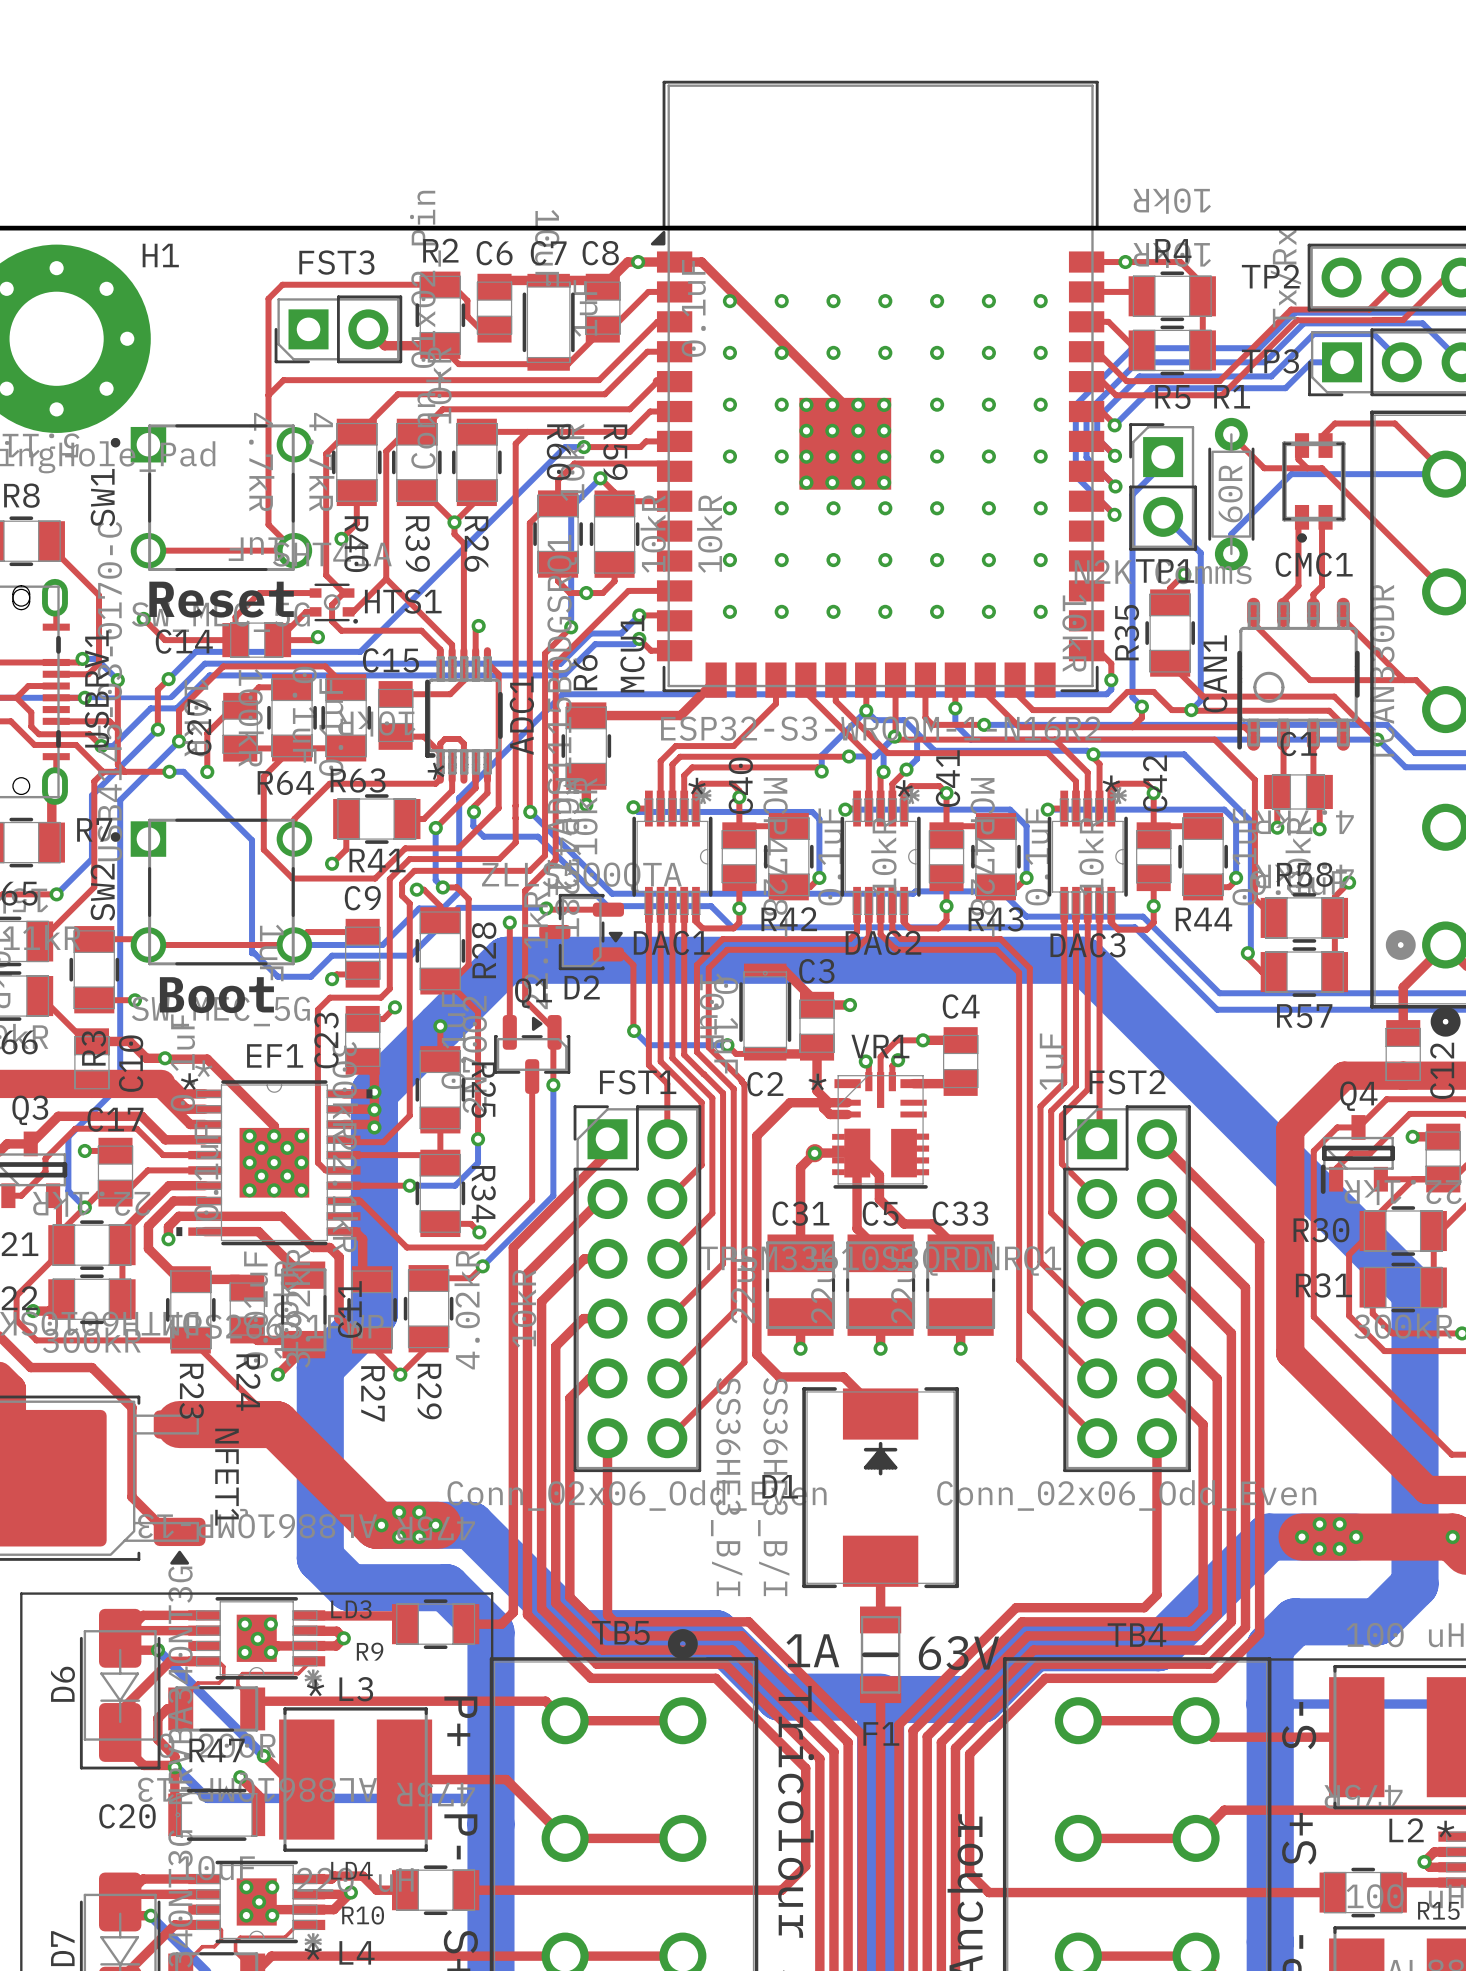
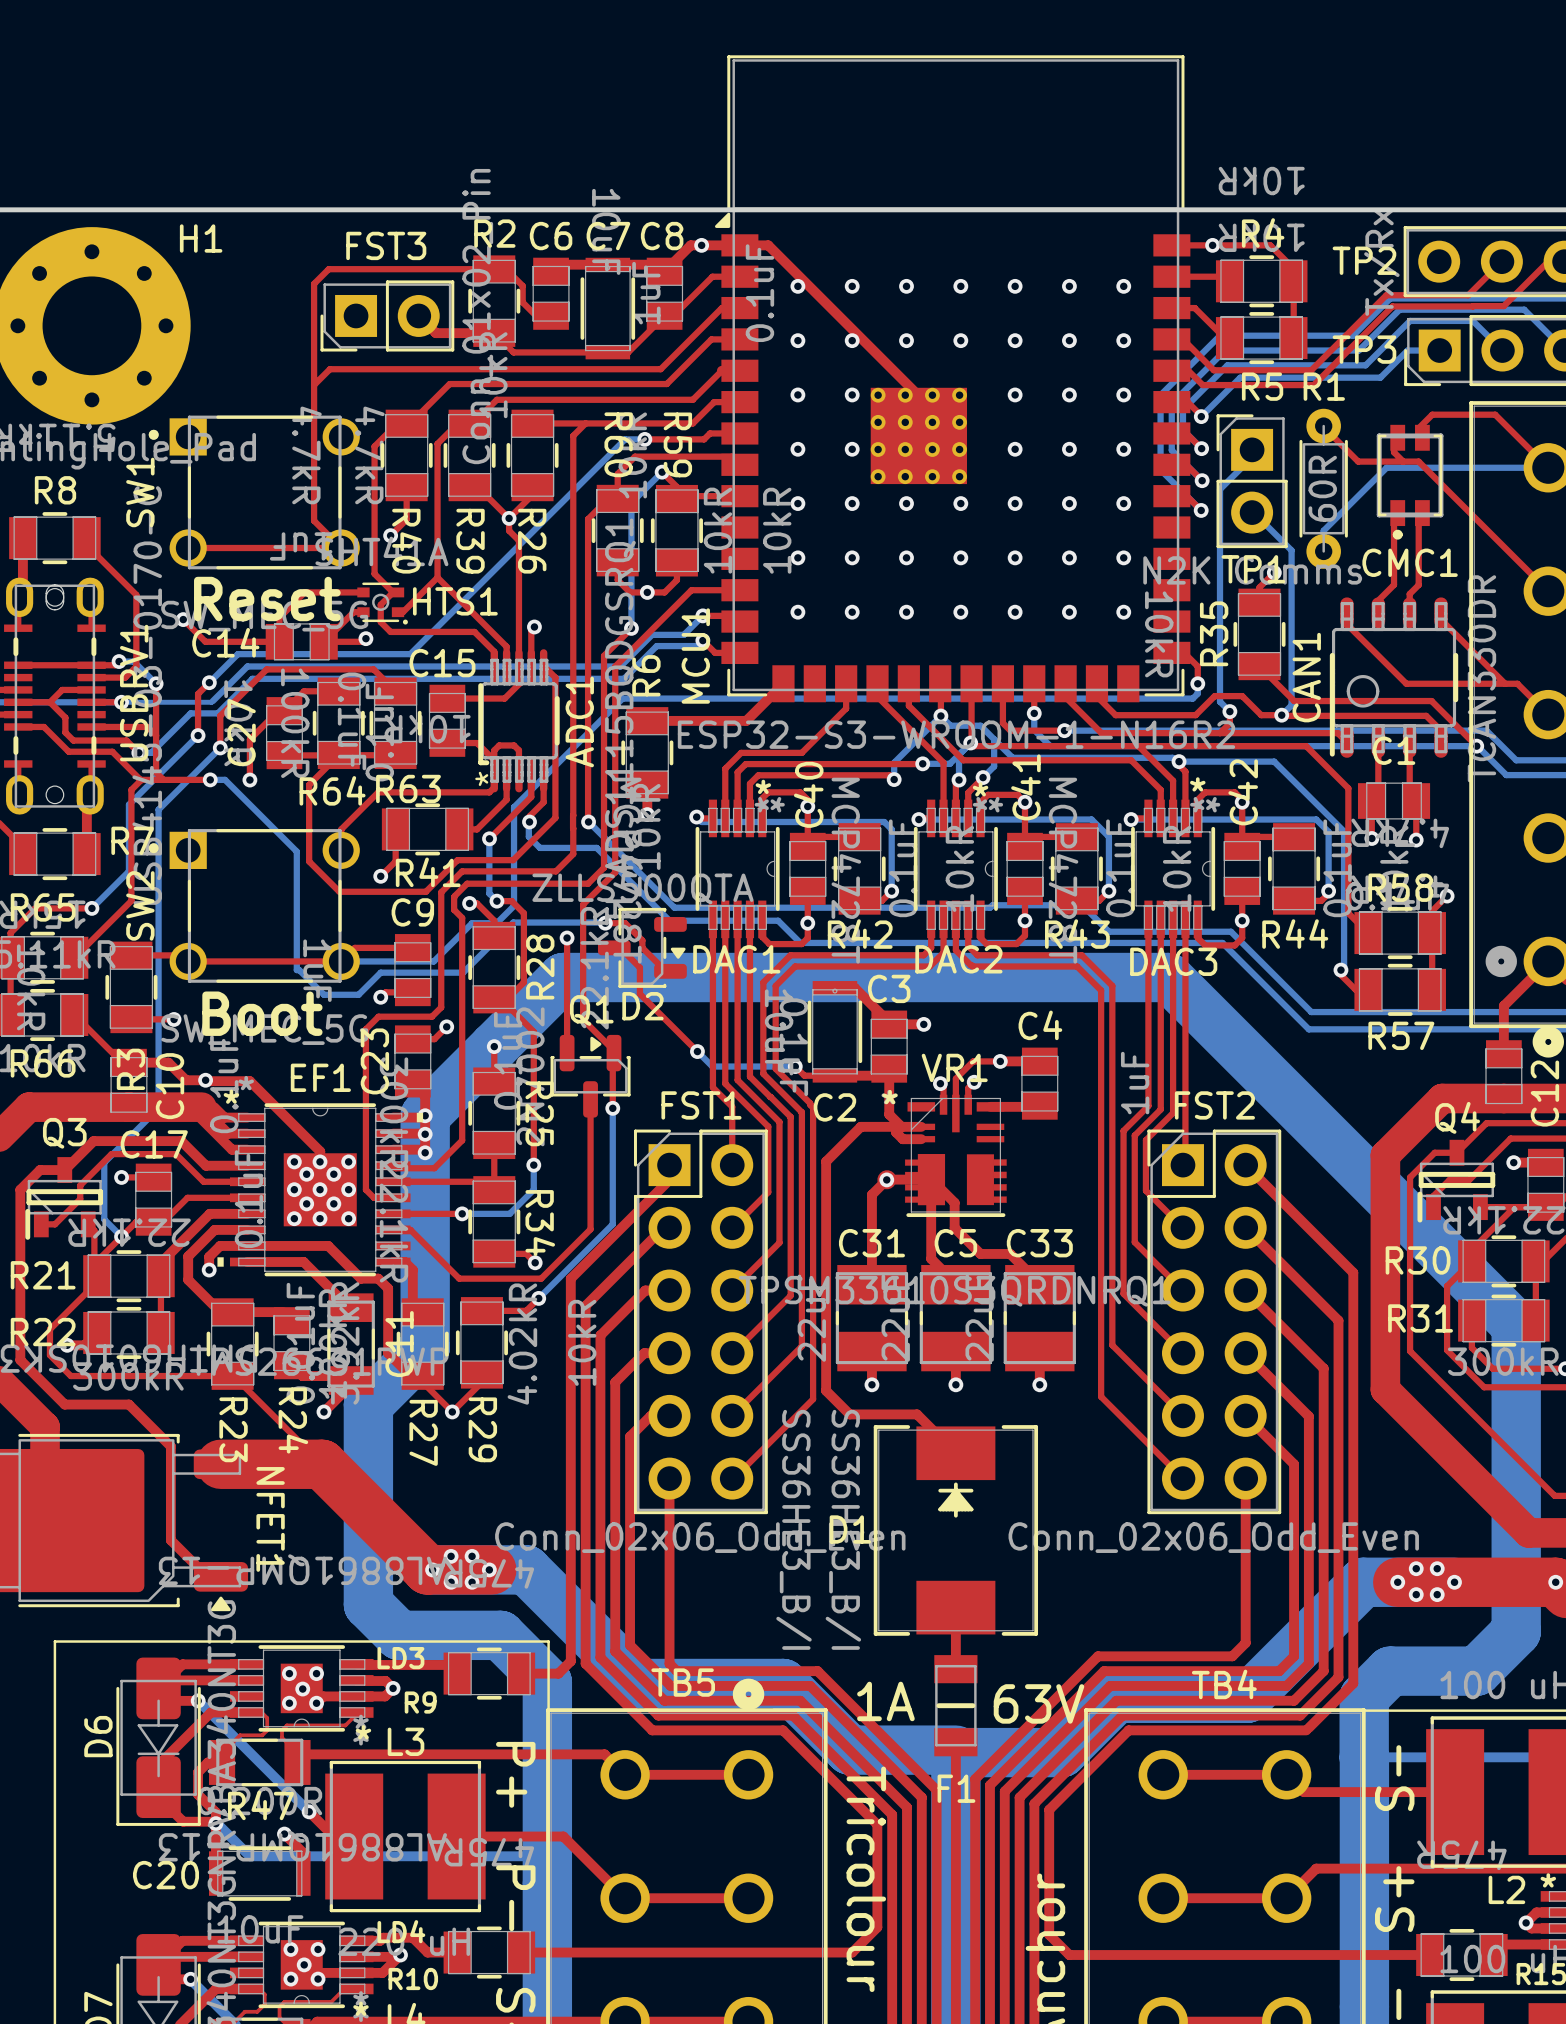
top track: (546, 908) (608, 909) -> (605, 923) (625, 923) (642, 940) (642, 947) (665, 971) (670, 971)
top track: (608, 954) (622, 954) (633, 965) (633, 1030) -> (614, 947) (620, 947) (639, 967) (639, 994) (696, 1050)

